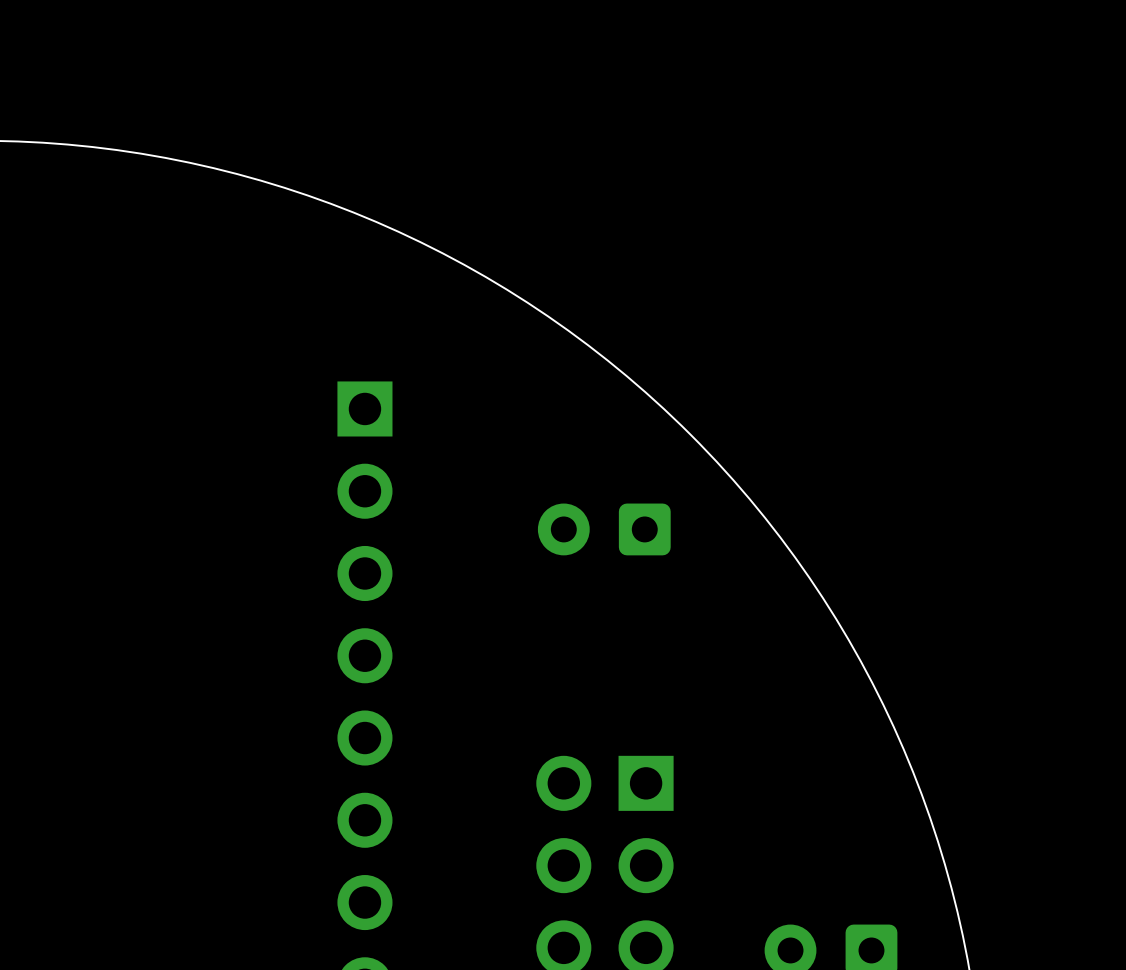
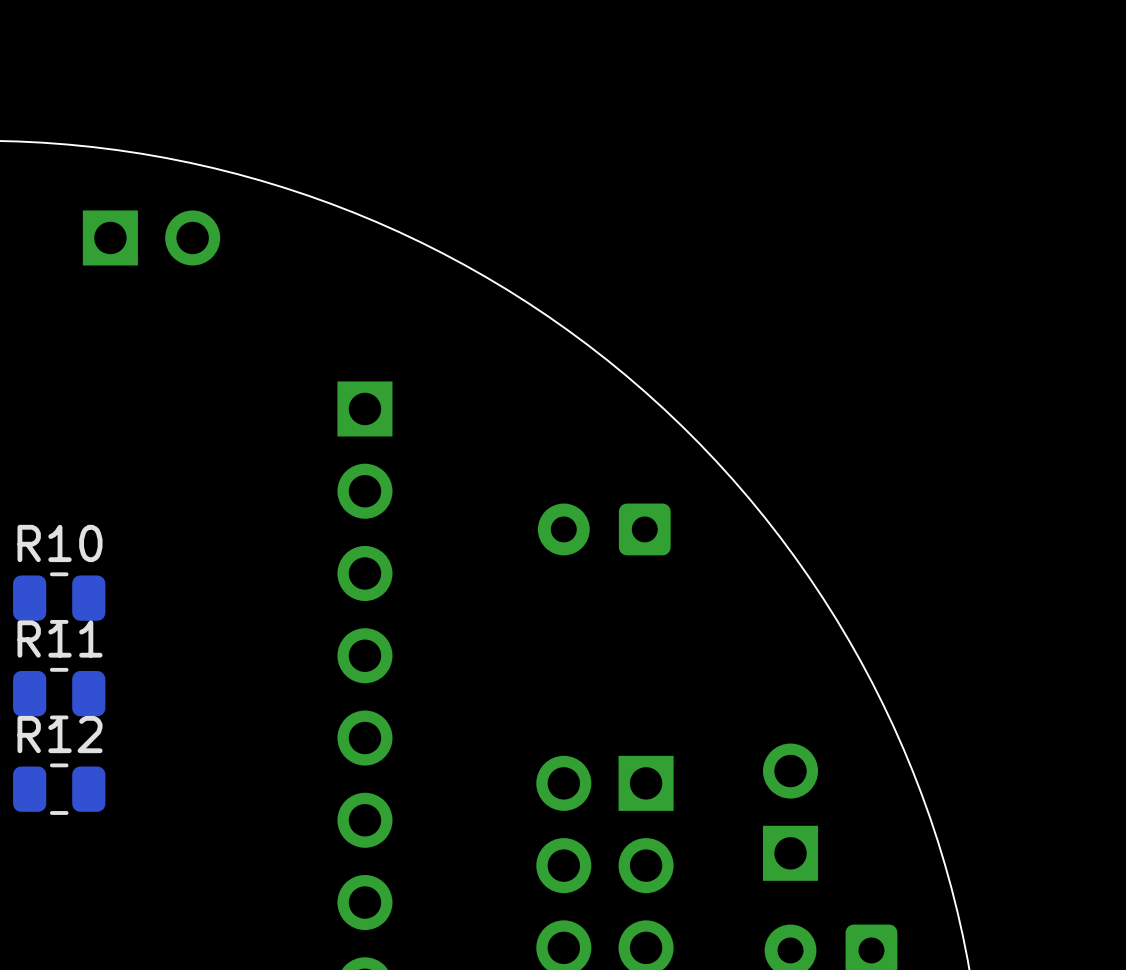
part: none -> (151, 237)
R10: none -> (59, 598)
R11: none -> (59, 693)
R12: none -> (59, 789)
part: none -> (790, 812)

